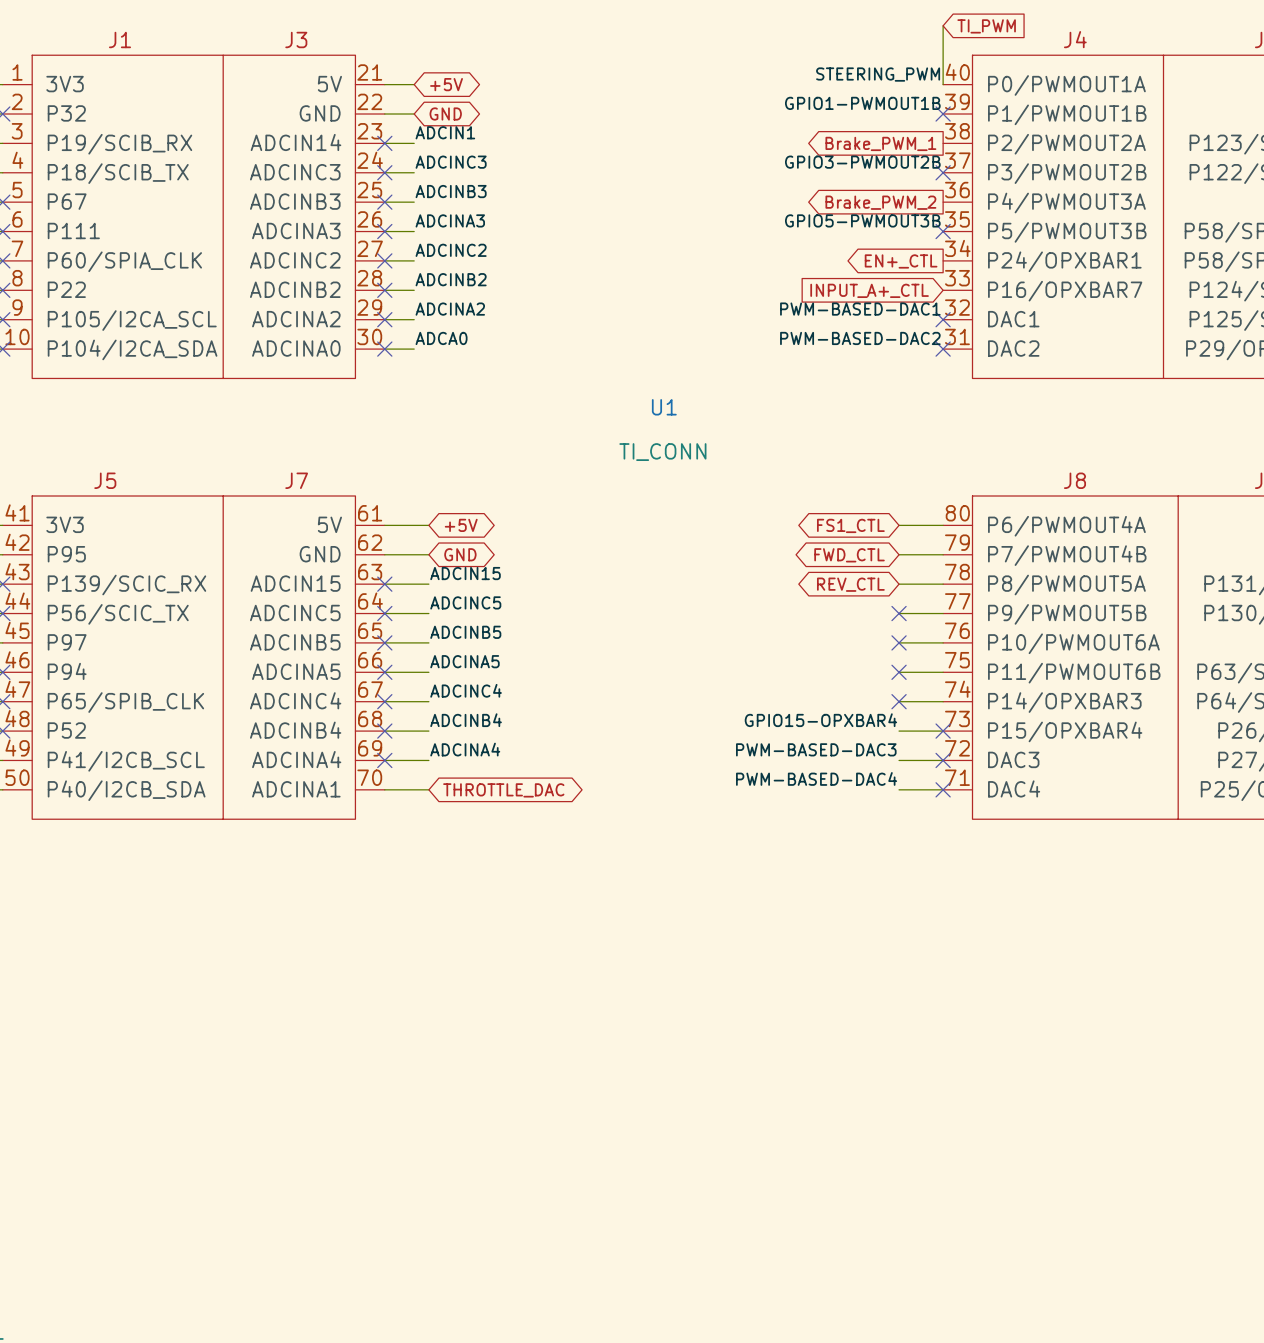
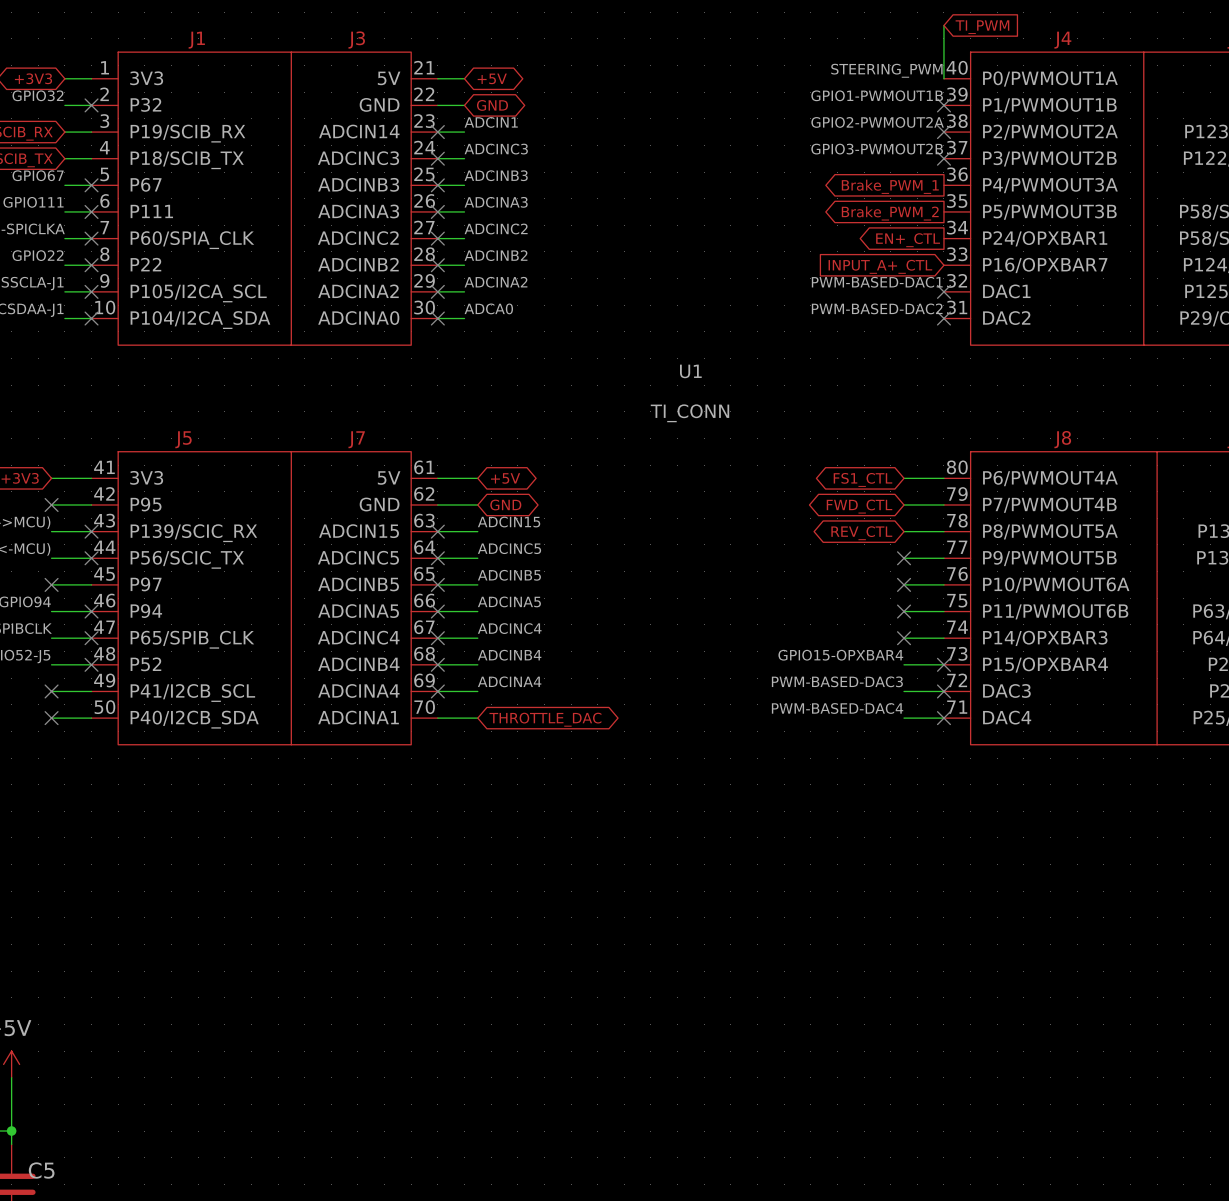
label: none -> GPIO2-PWMOUT2A (877, 122)
global label: Brake_PWM_1 (880, 143) -> none
no-connect mark: none -> (943, 132)
global label: Brake_PWM_2 (880, 202) -> Brake_PWM_1 (890, 186)
label: GPIO5-PWMOUT3B (862, 220) -> none
no-connect mark: (943, 231) -> none
global label: none -> Brake_PWM_2 (890, 213)

